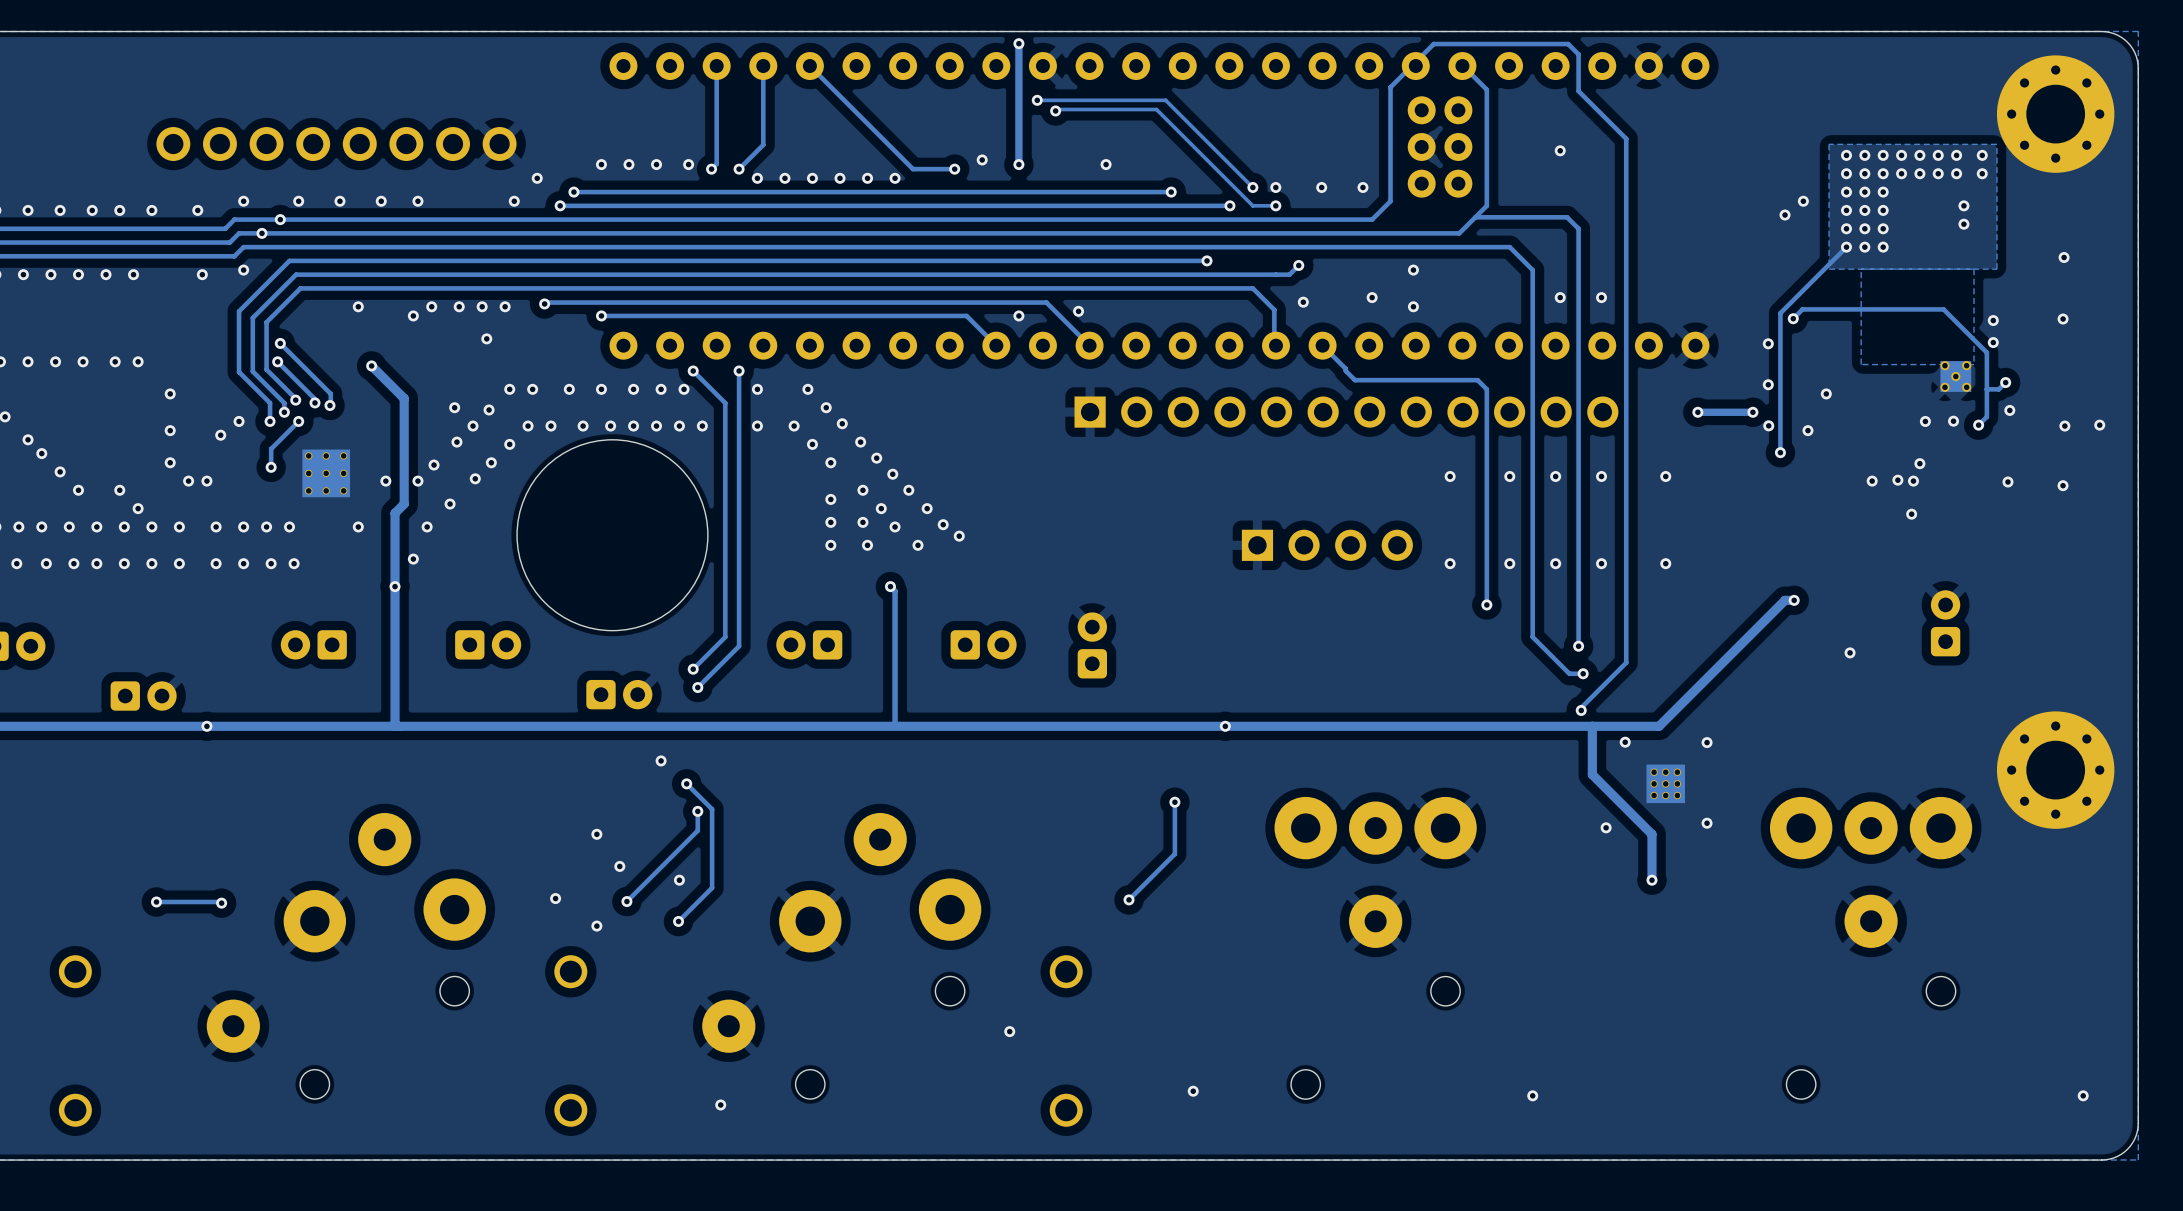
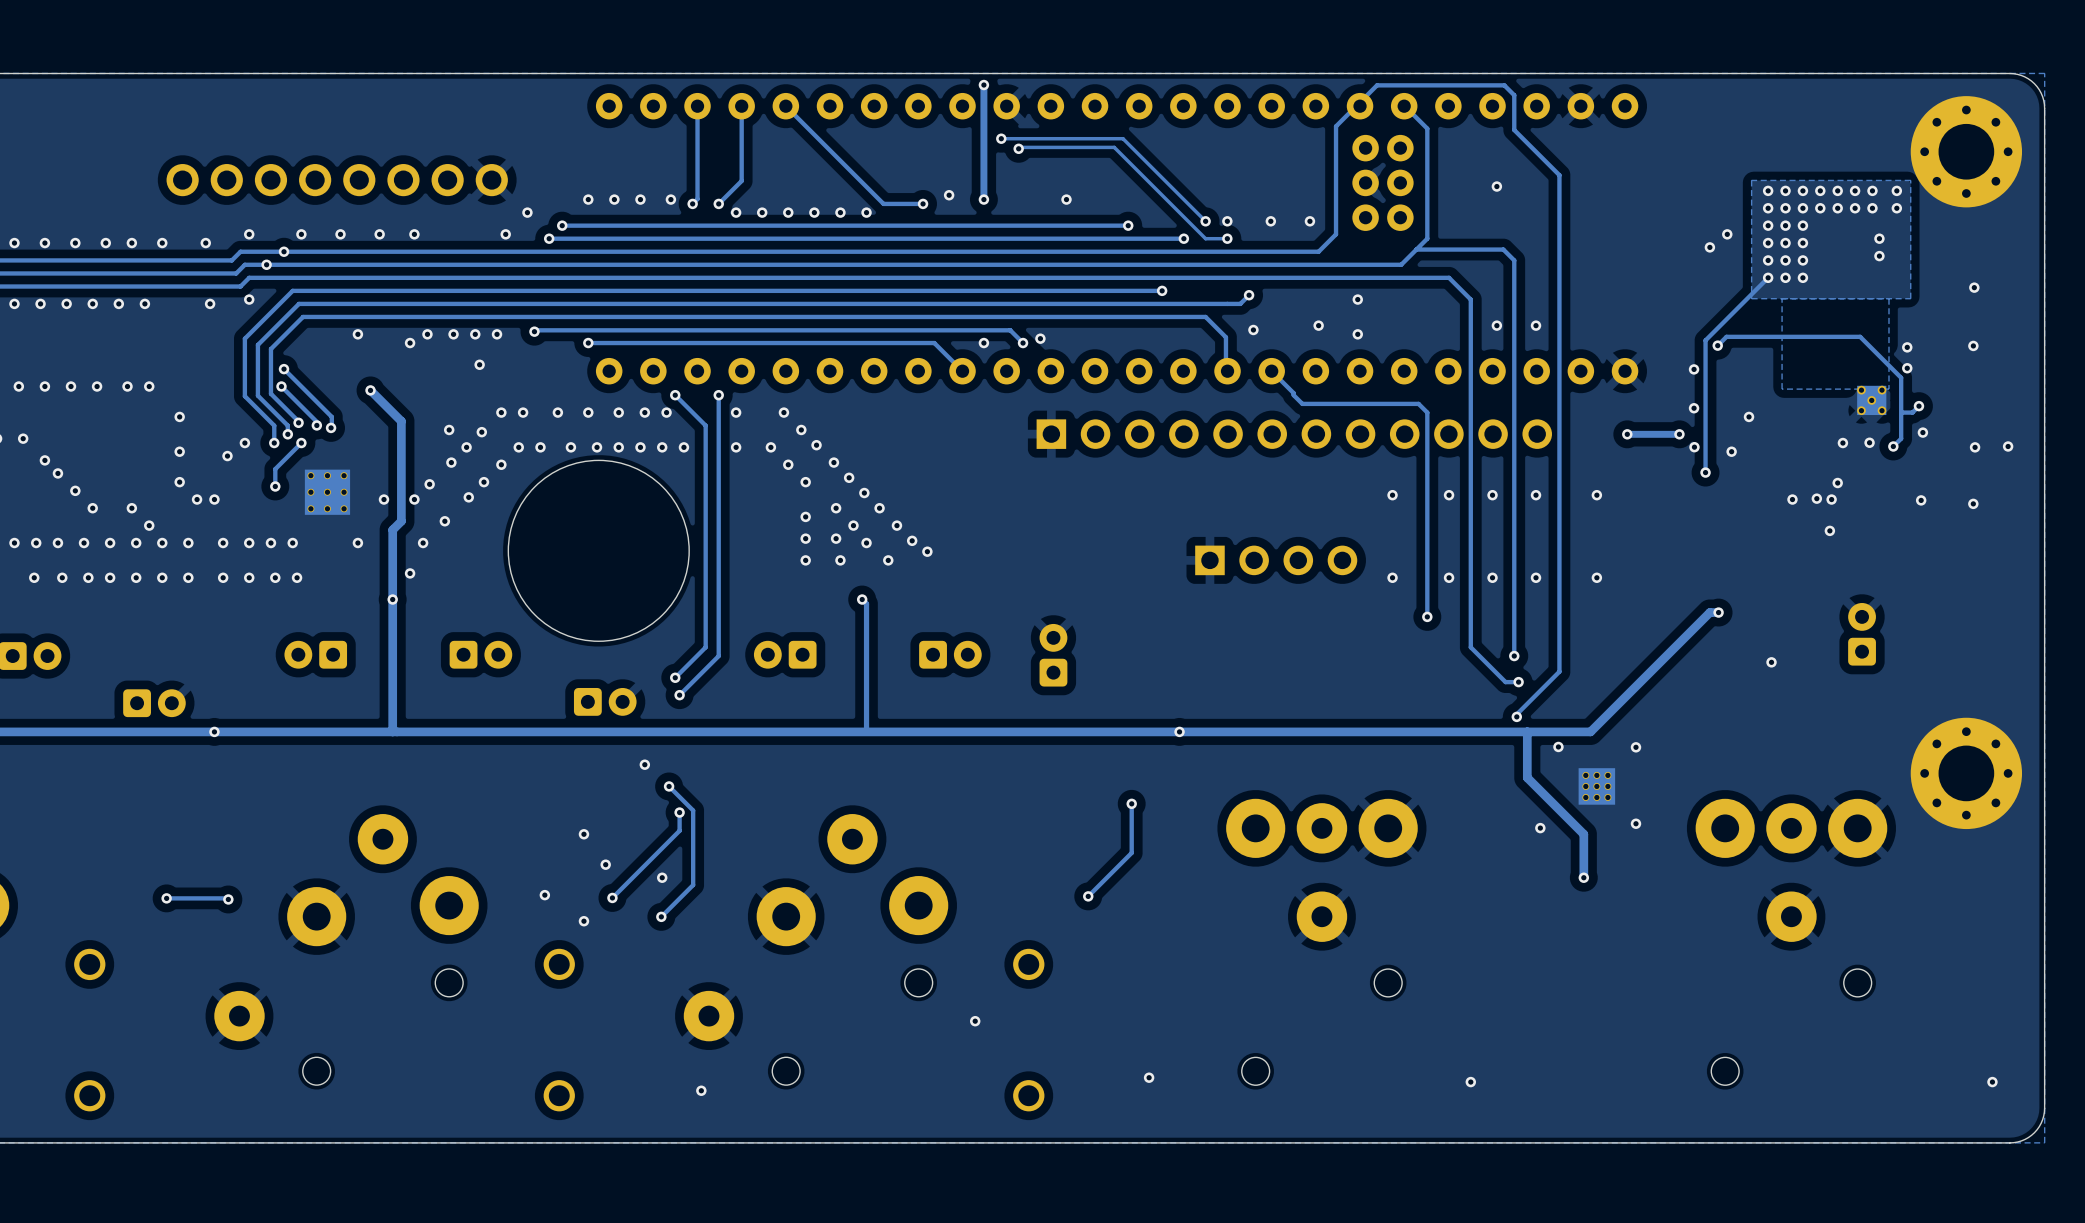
track: (1046, 302) (1089, 345) -> (1010, 330) (1023, 343)
via: none -> (1023, 343)

